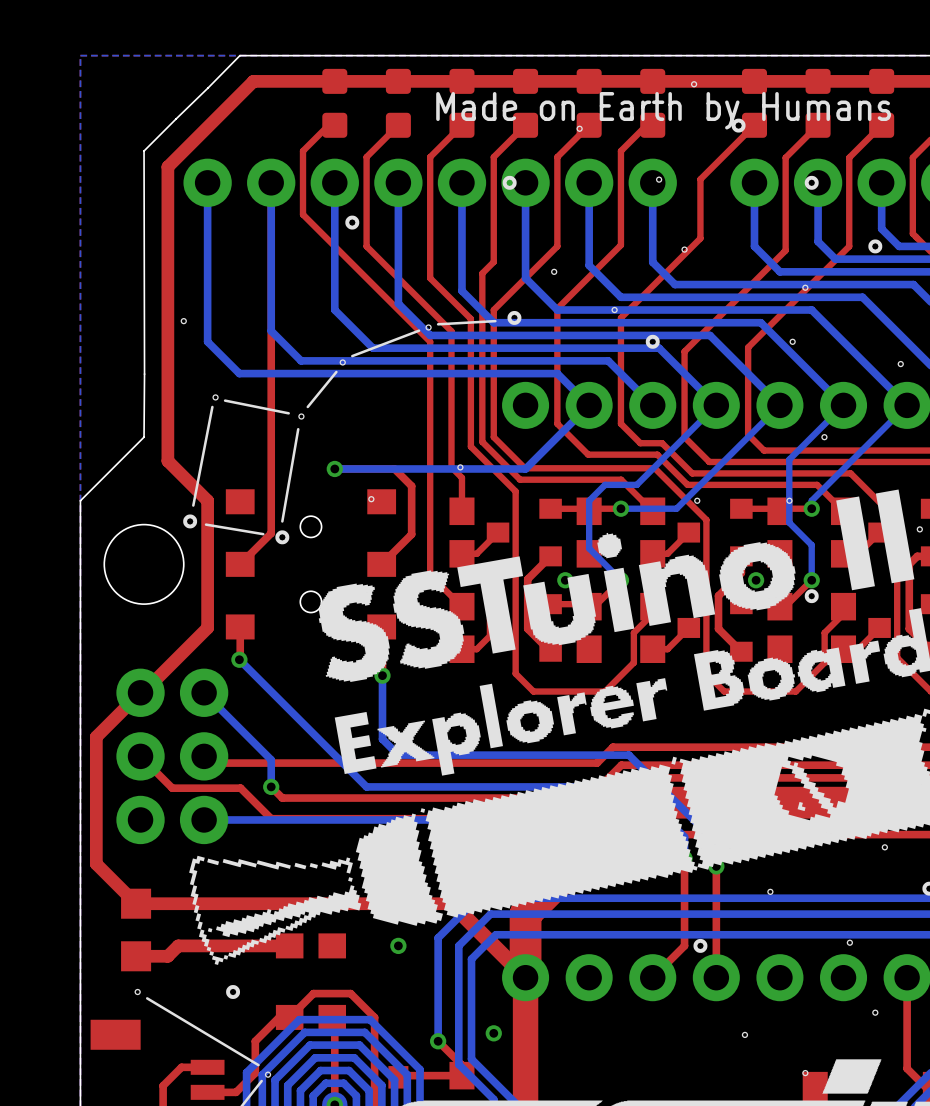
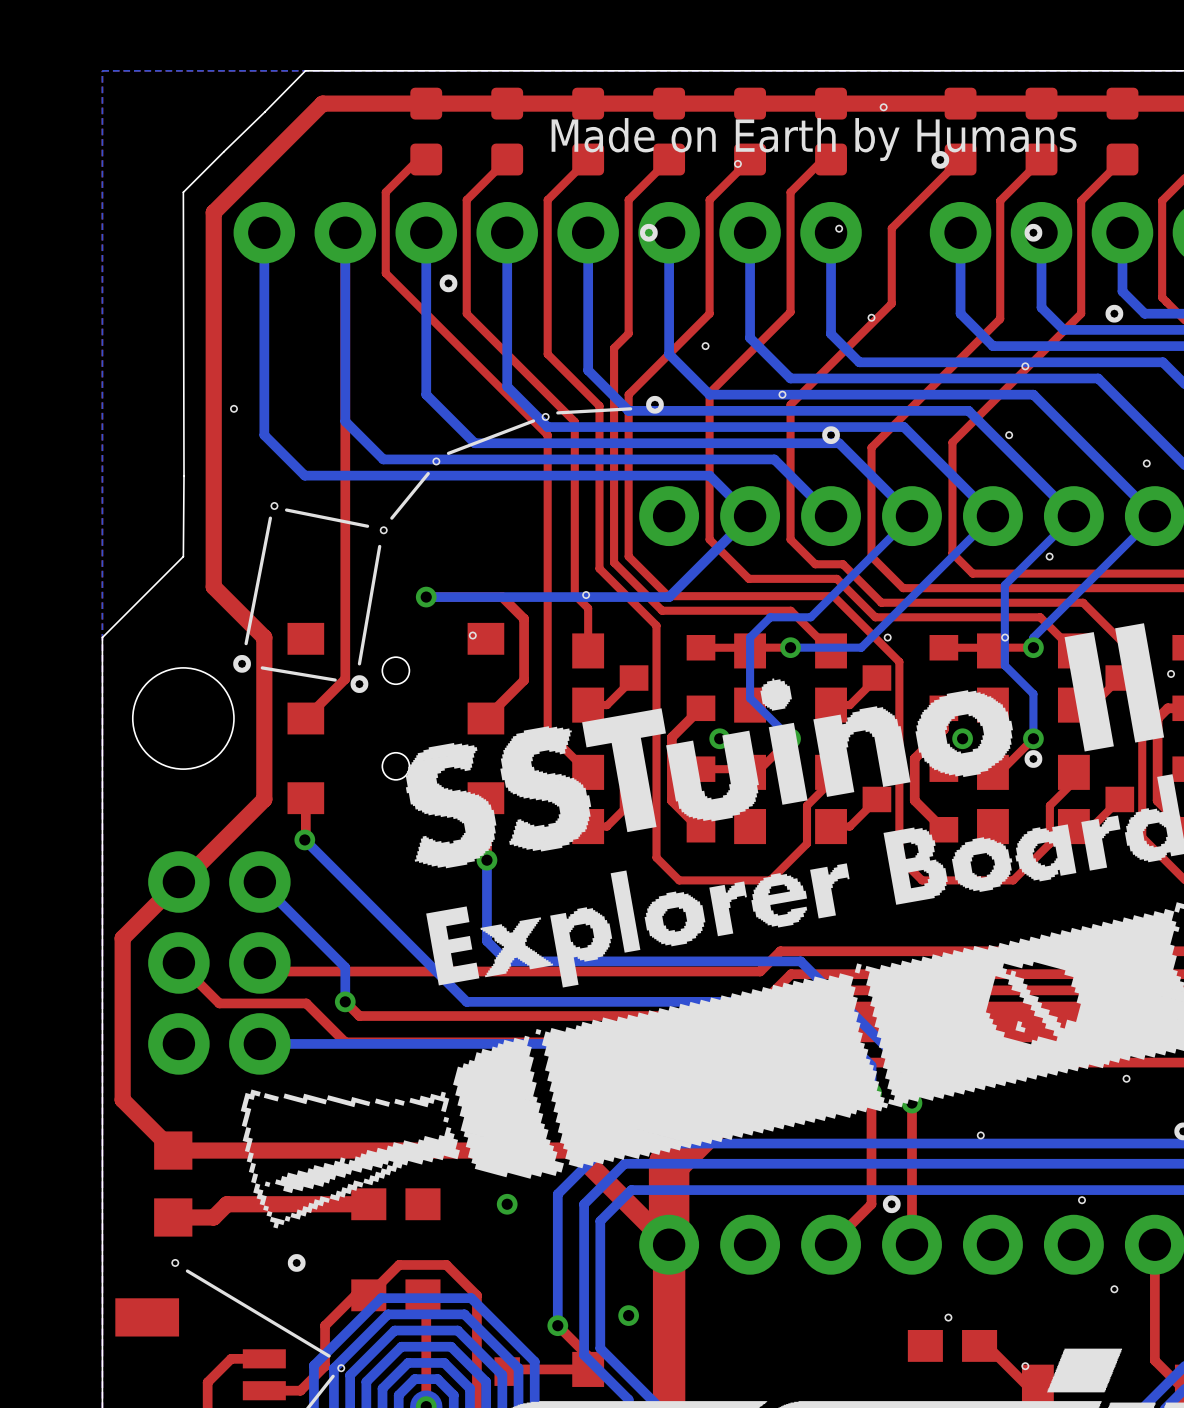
part: none -> (952, 1345)
top track: none -> (979, 1345) (987, 1345) (1037, 1396)

